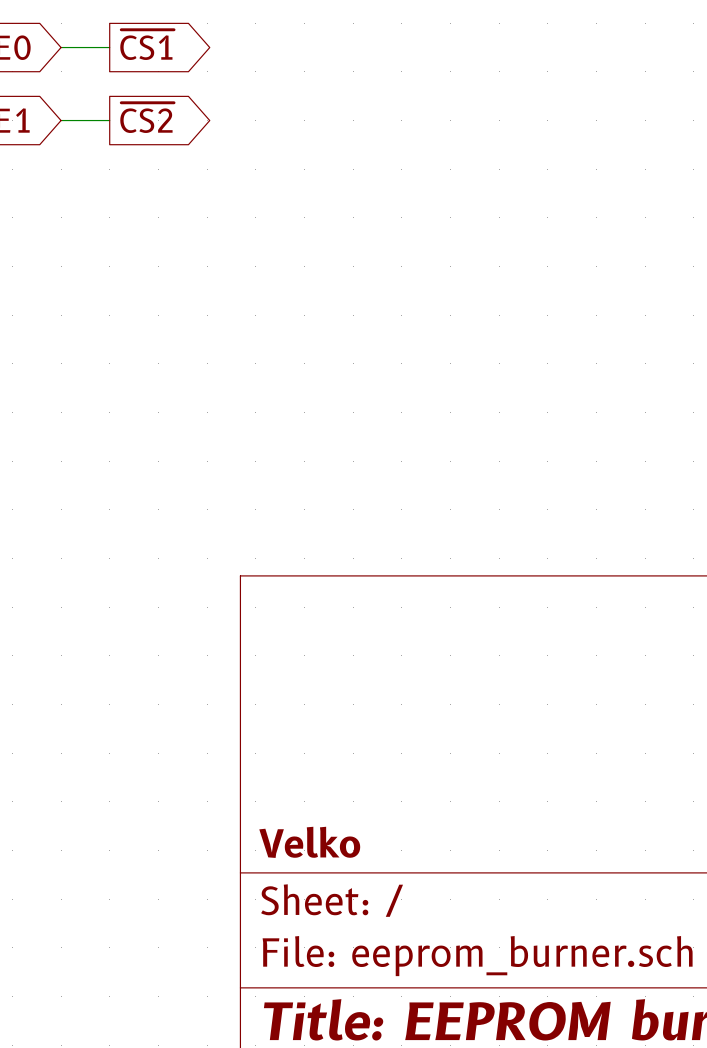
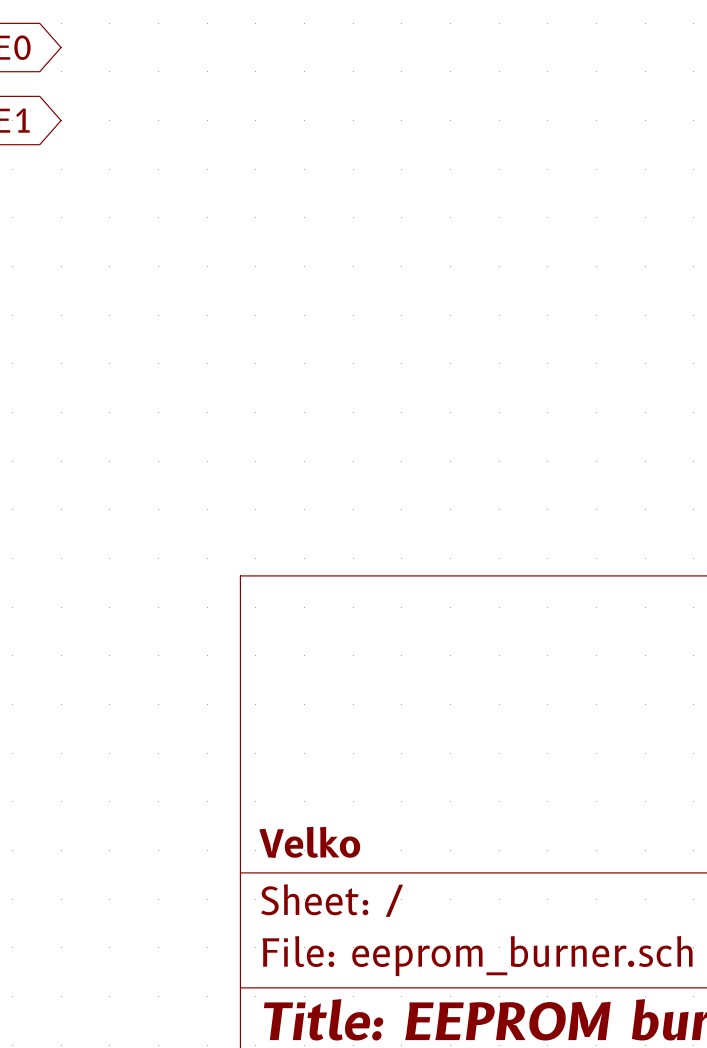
global label: ~{CS1} (147, 44) -> none
wire: (61, 47) (109, 47) -> none
global label: ~{CS2} (147, 117) -> none
wire: (61, 120) (109, 120) -> none

